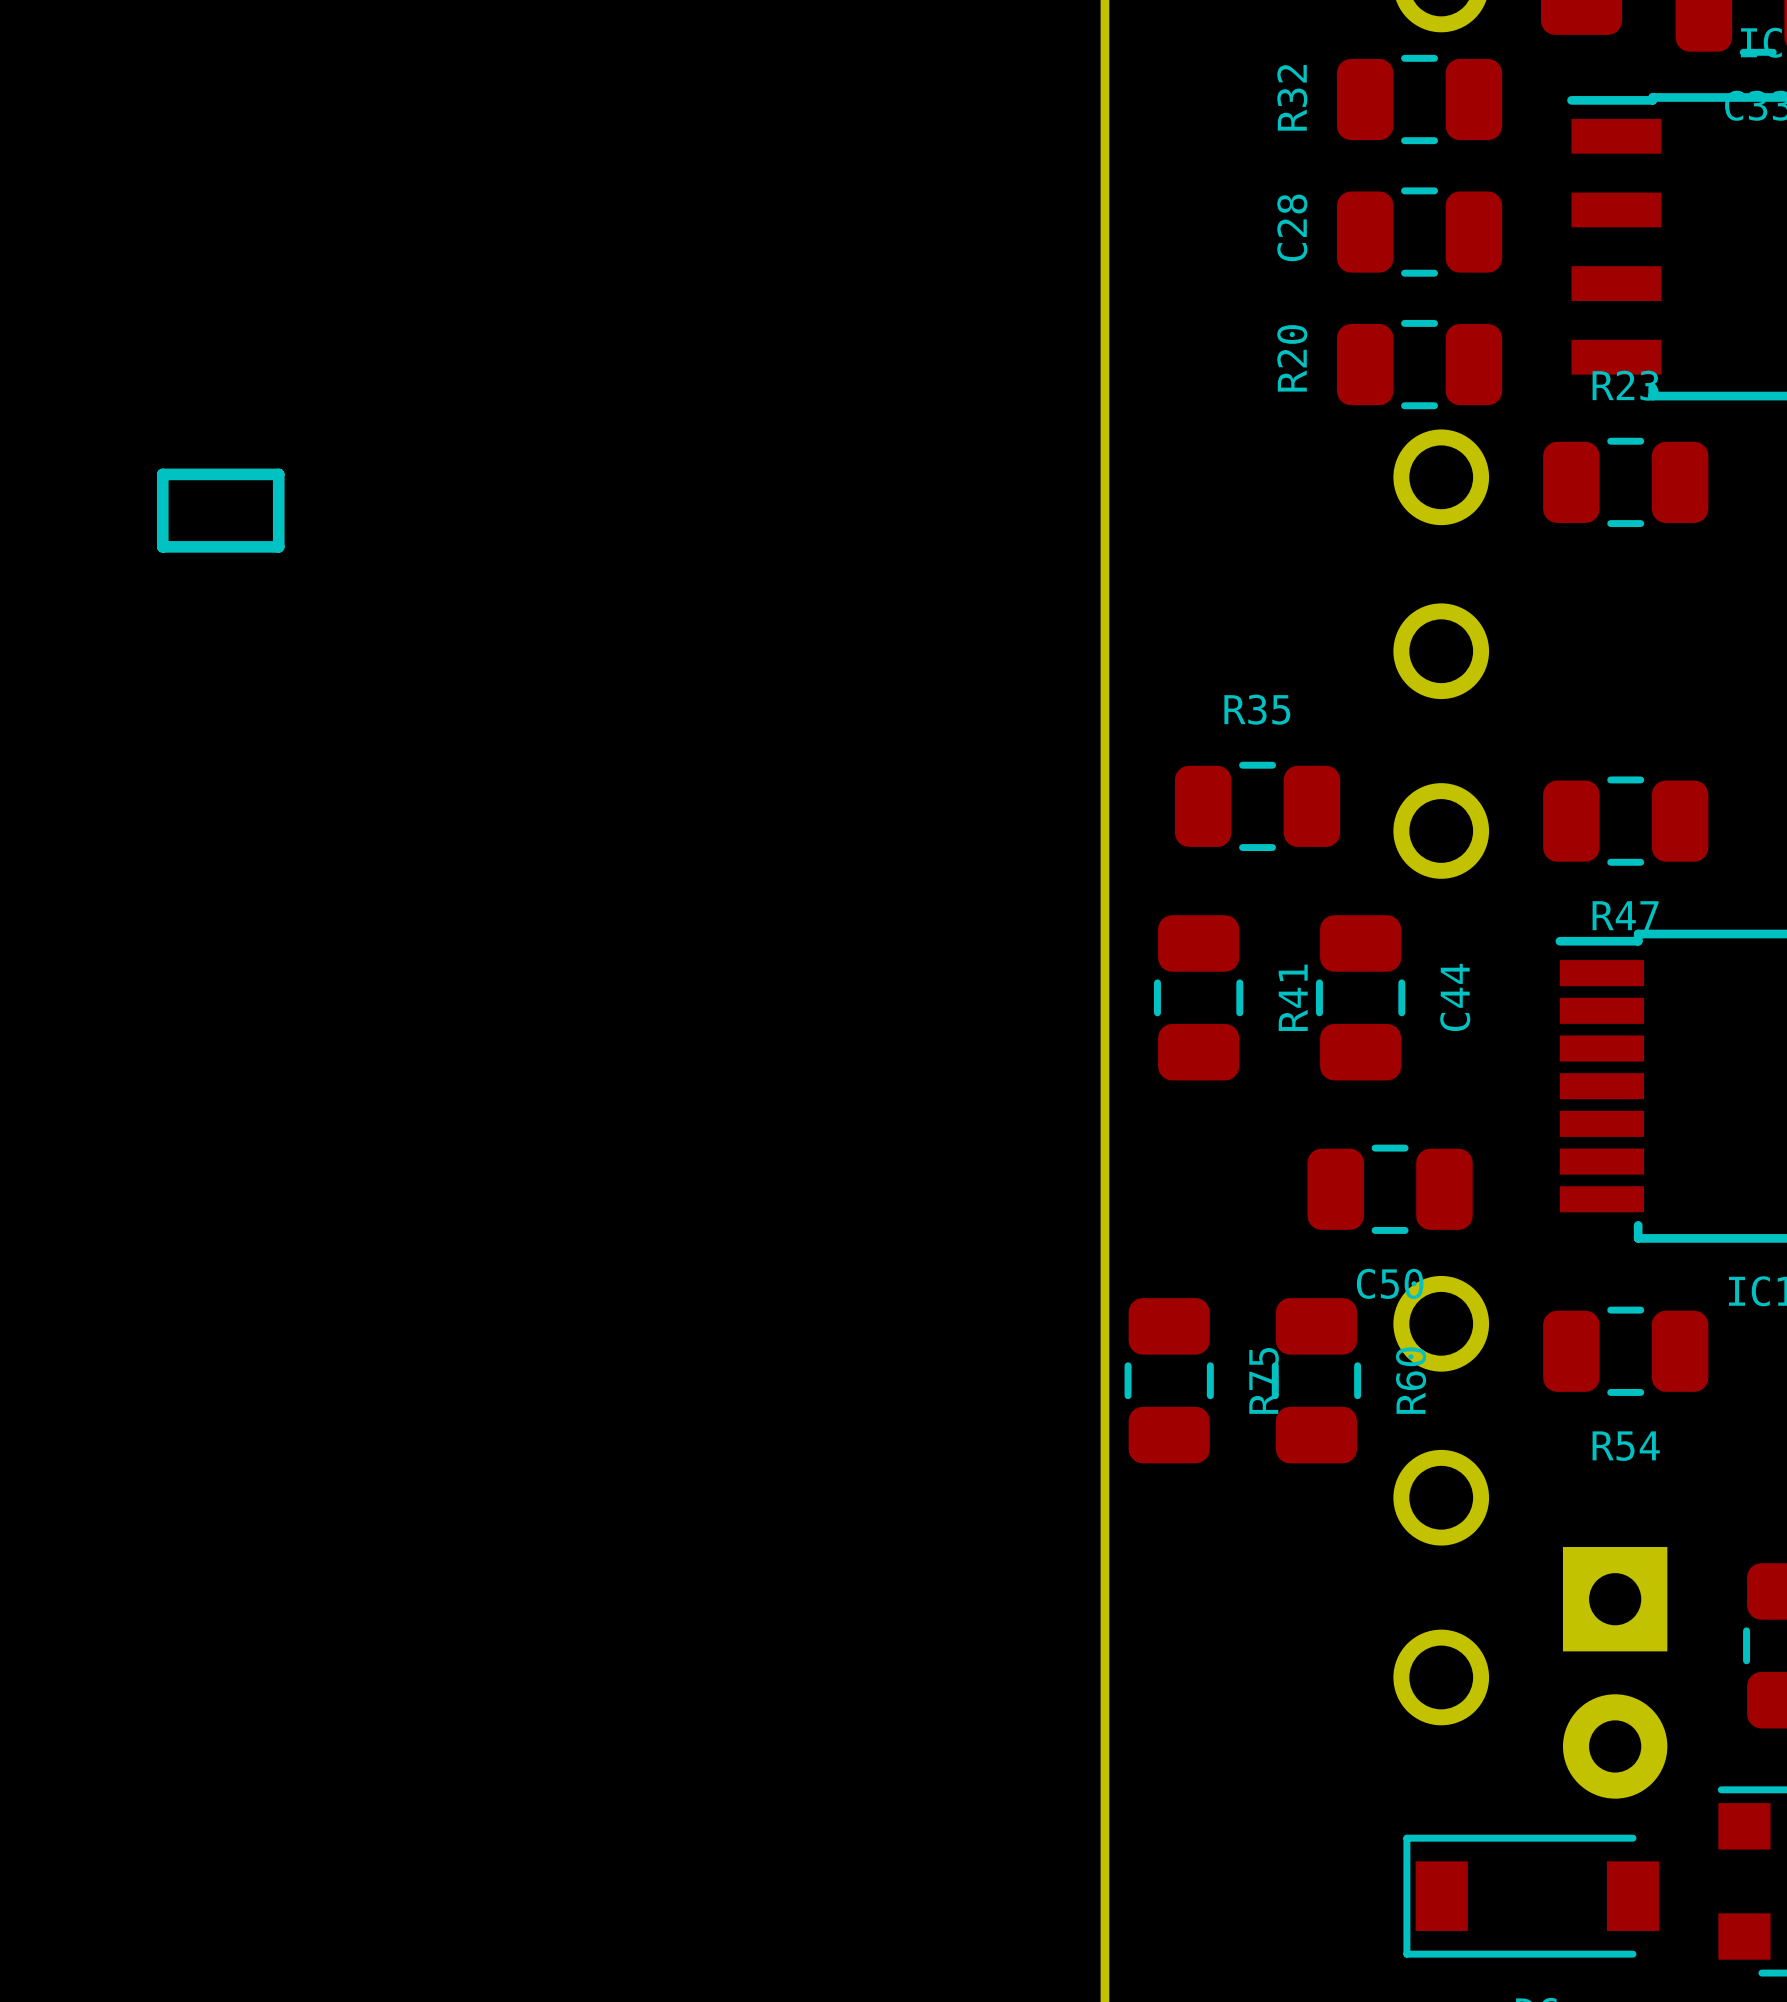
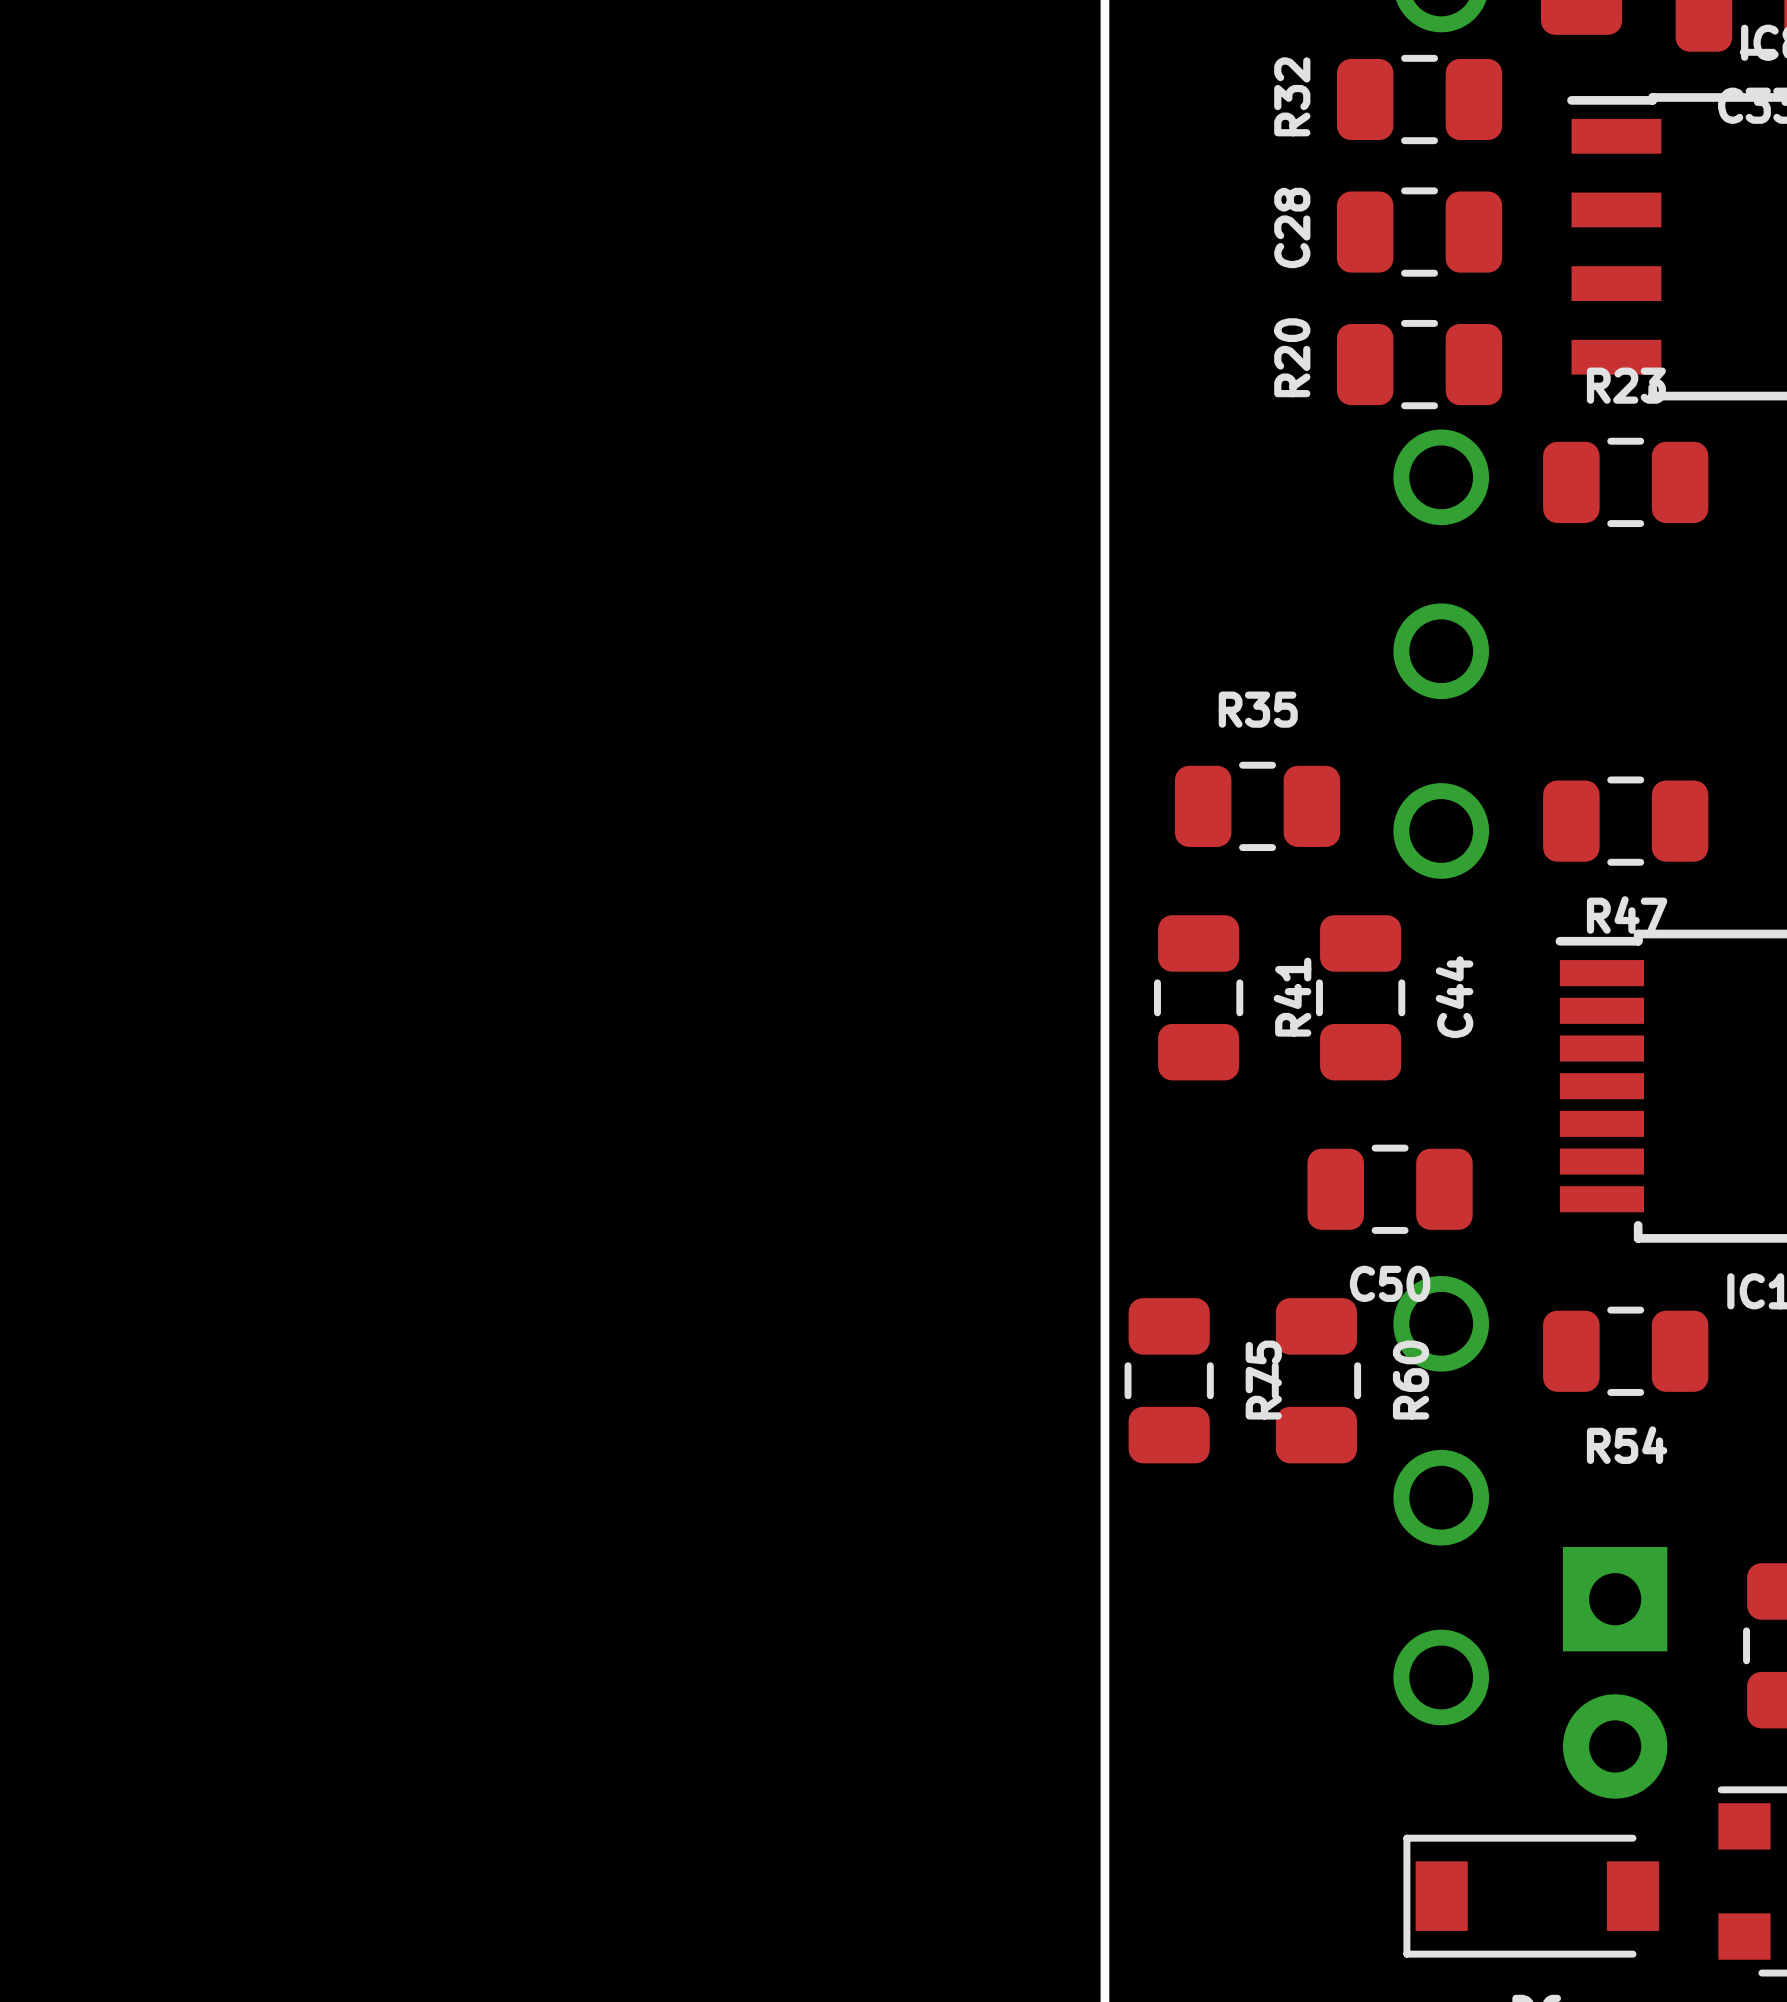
line: (162, 474) (162, 546) (278, 546) (278, 474) (162, 474) -> none

